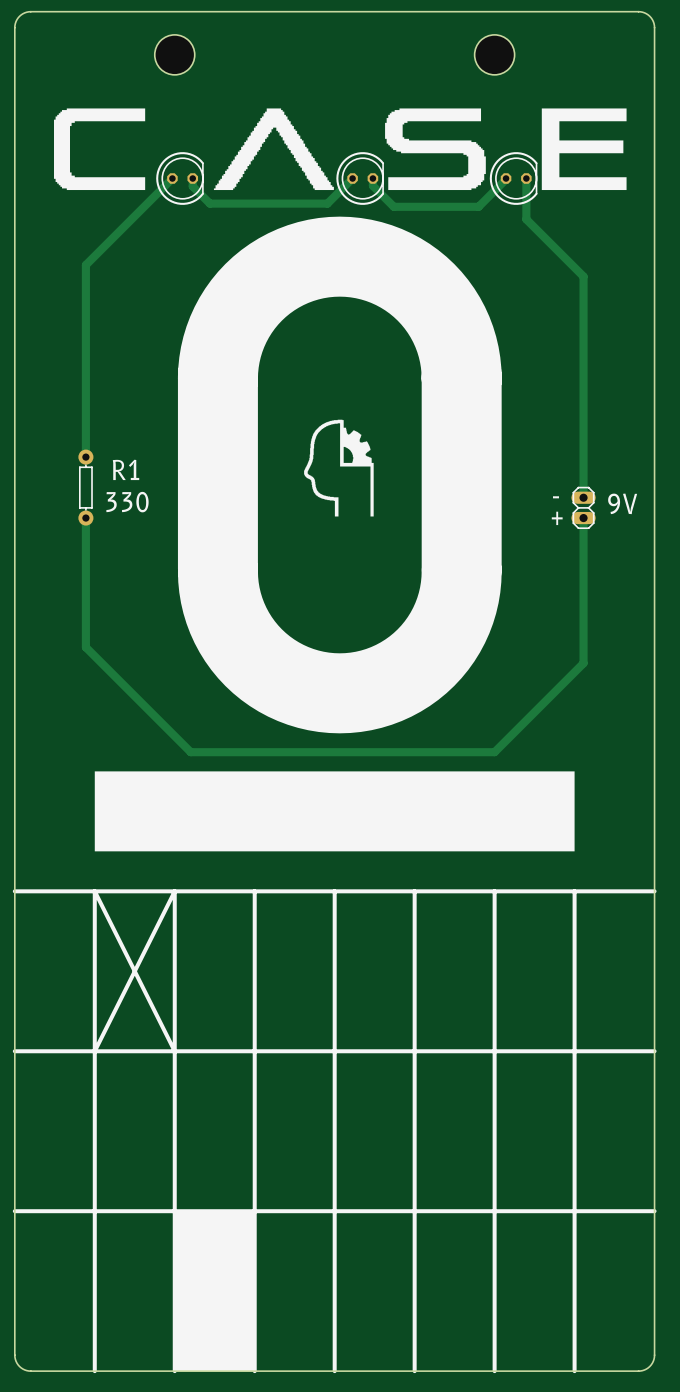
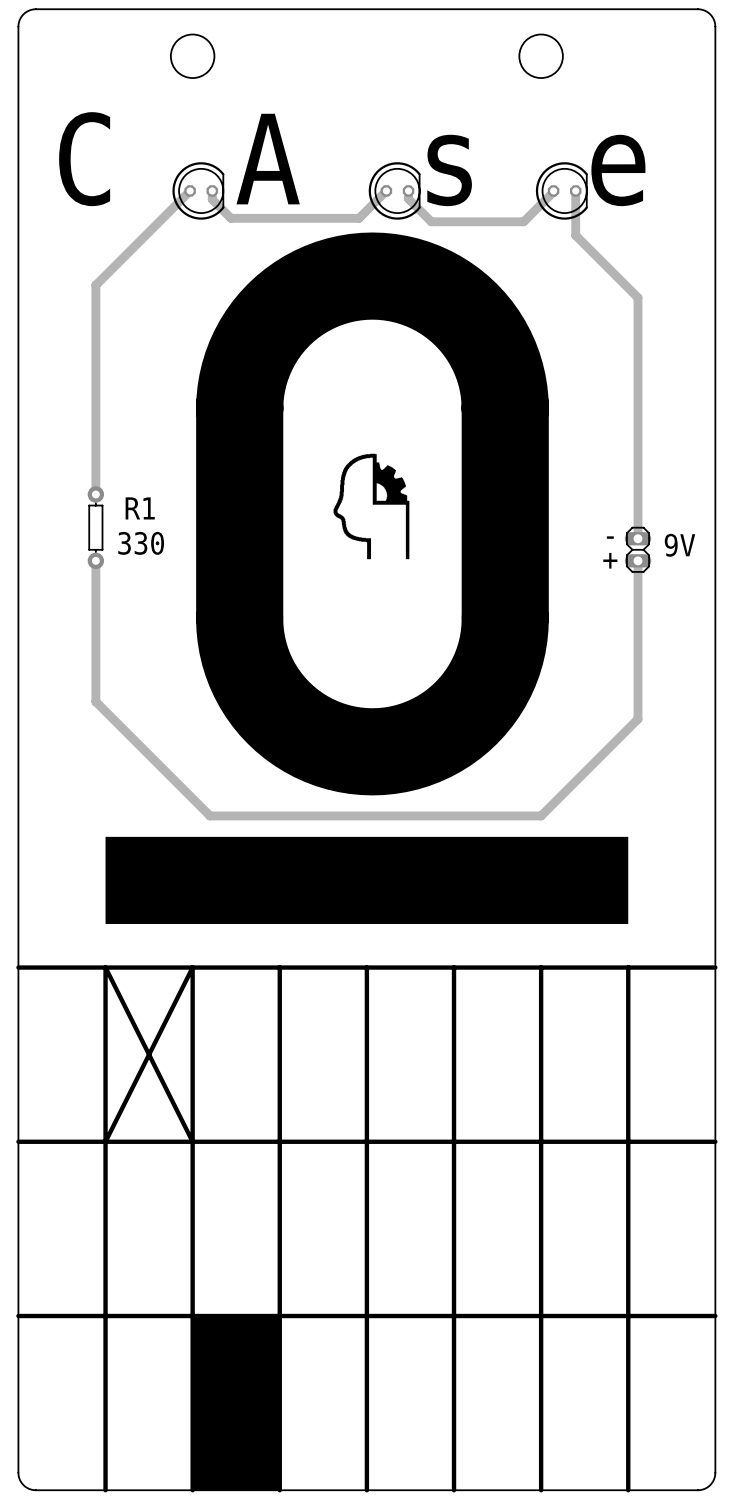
drawing: [54, 108, 146, 191] -> none
drawing: [213, 108, 334, 191] -> none
drawing: [385, 108, 486, 191] -> none
drawing: [541, 108, 627, 191] -> none
text: none -> C (84, 159)
text: none -> A (268, 159)
text: none -> s (449, 170)
text: none -> e (618, 170)

